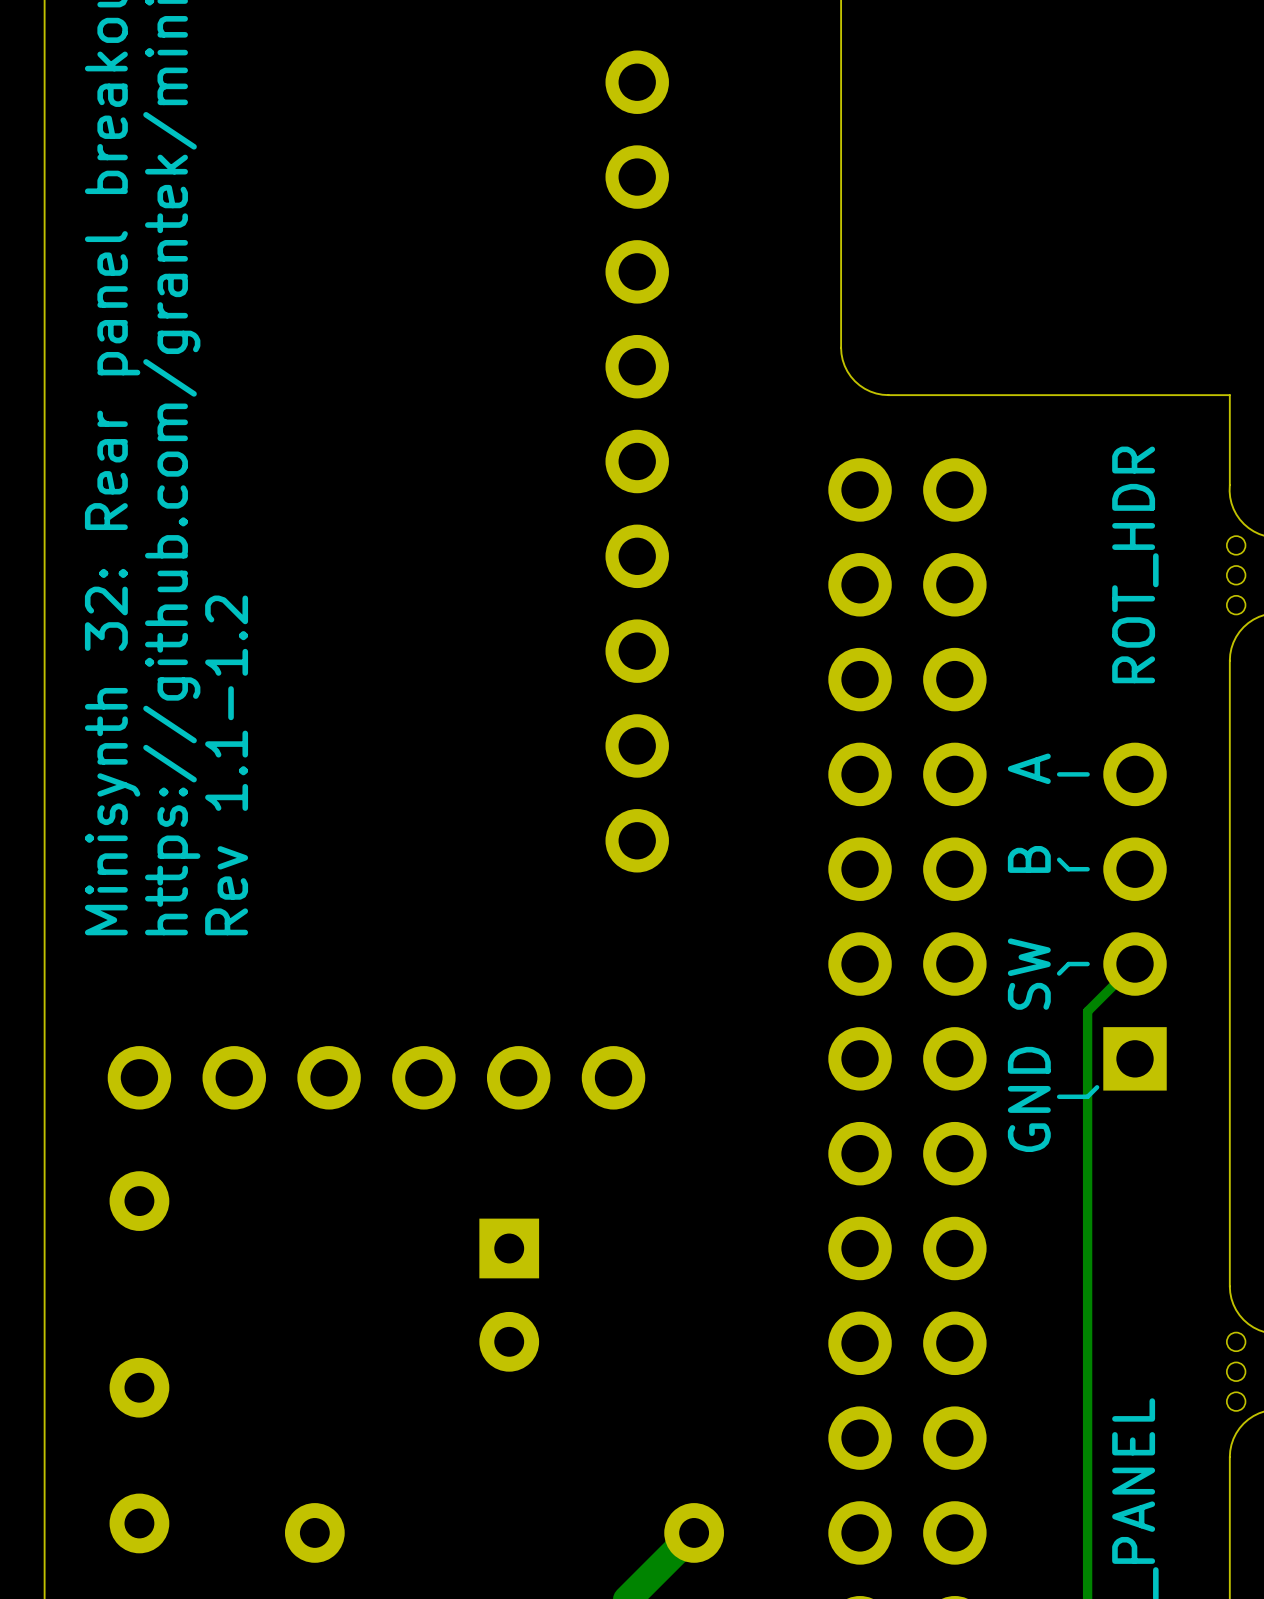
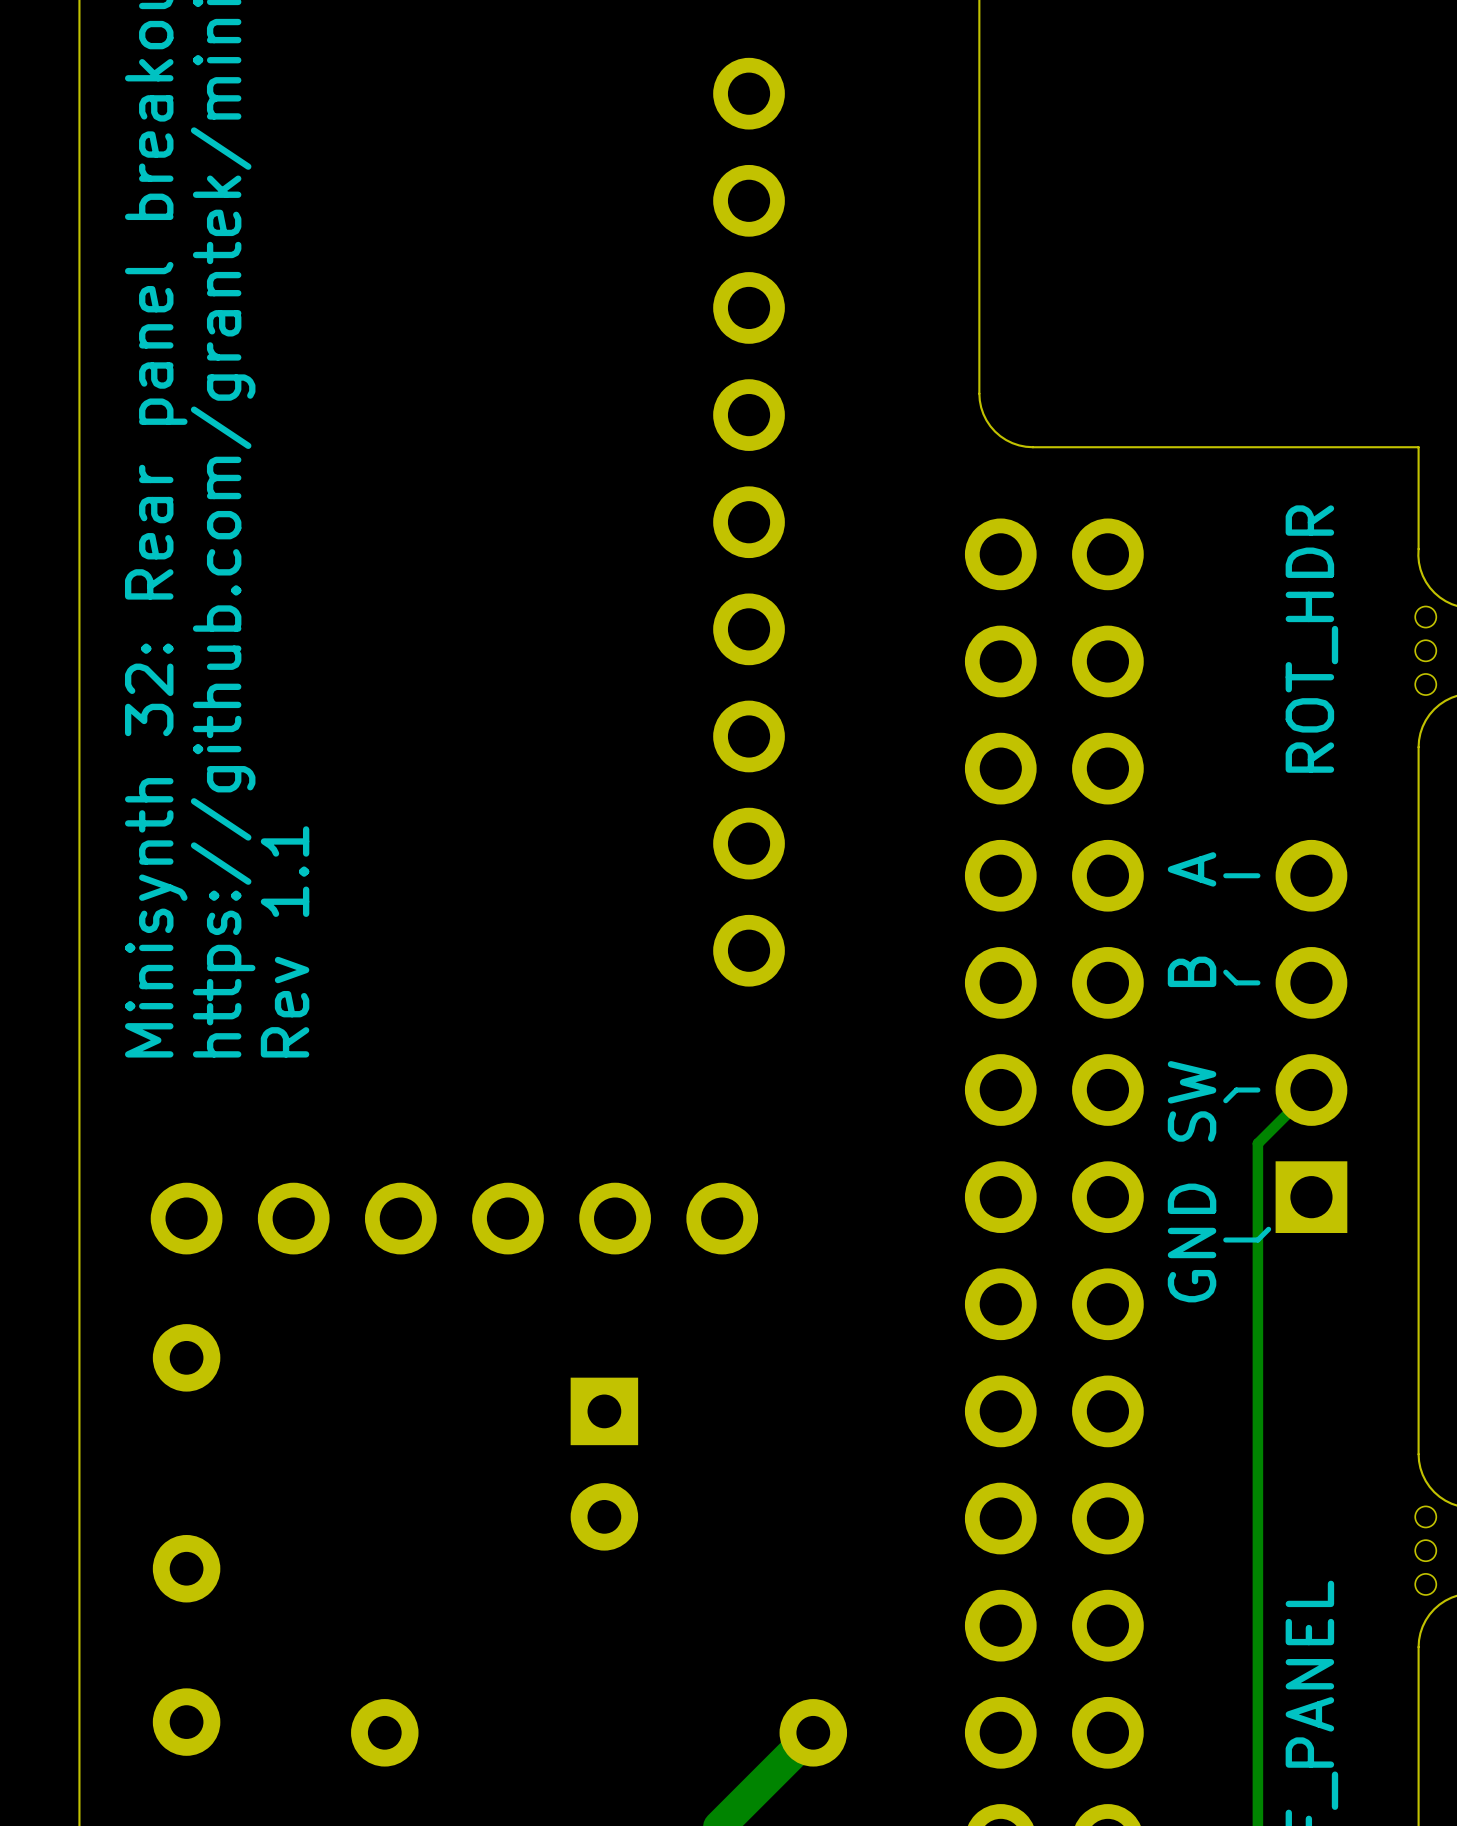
text: Rev 1.1-1.2 (226, 765) -> Rev 1.1 (285, 941)

